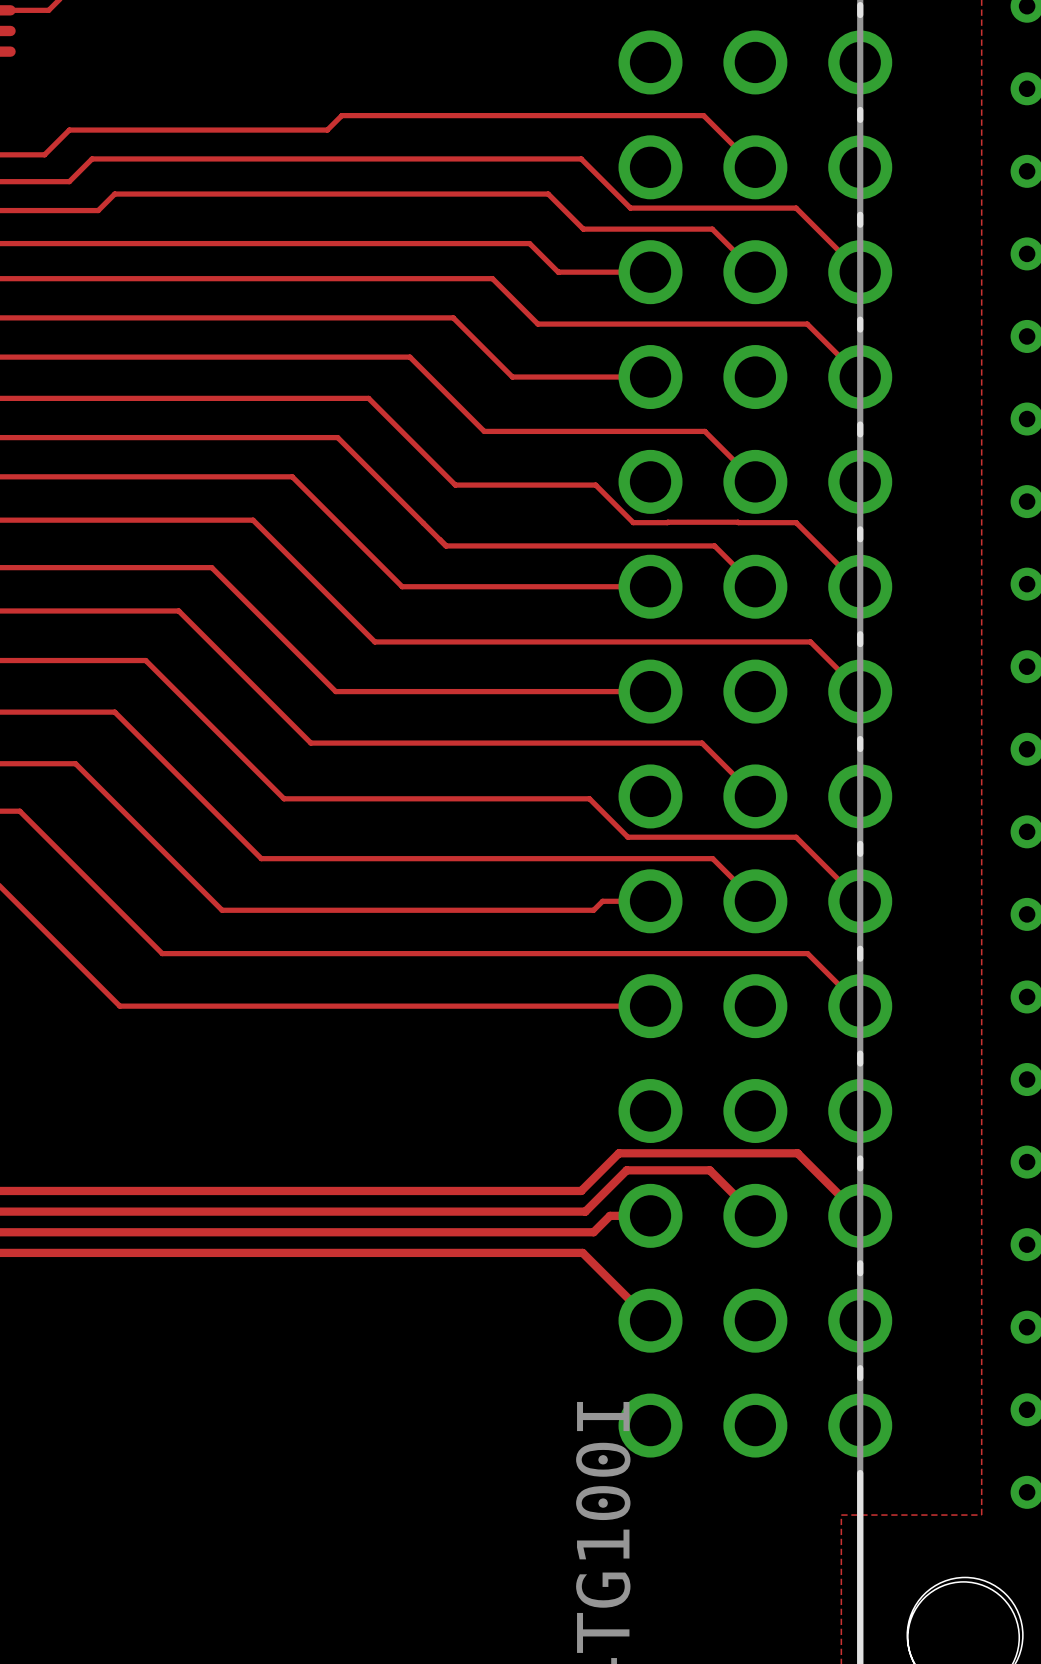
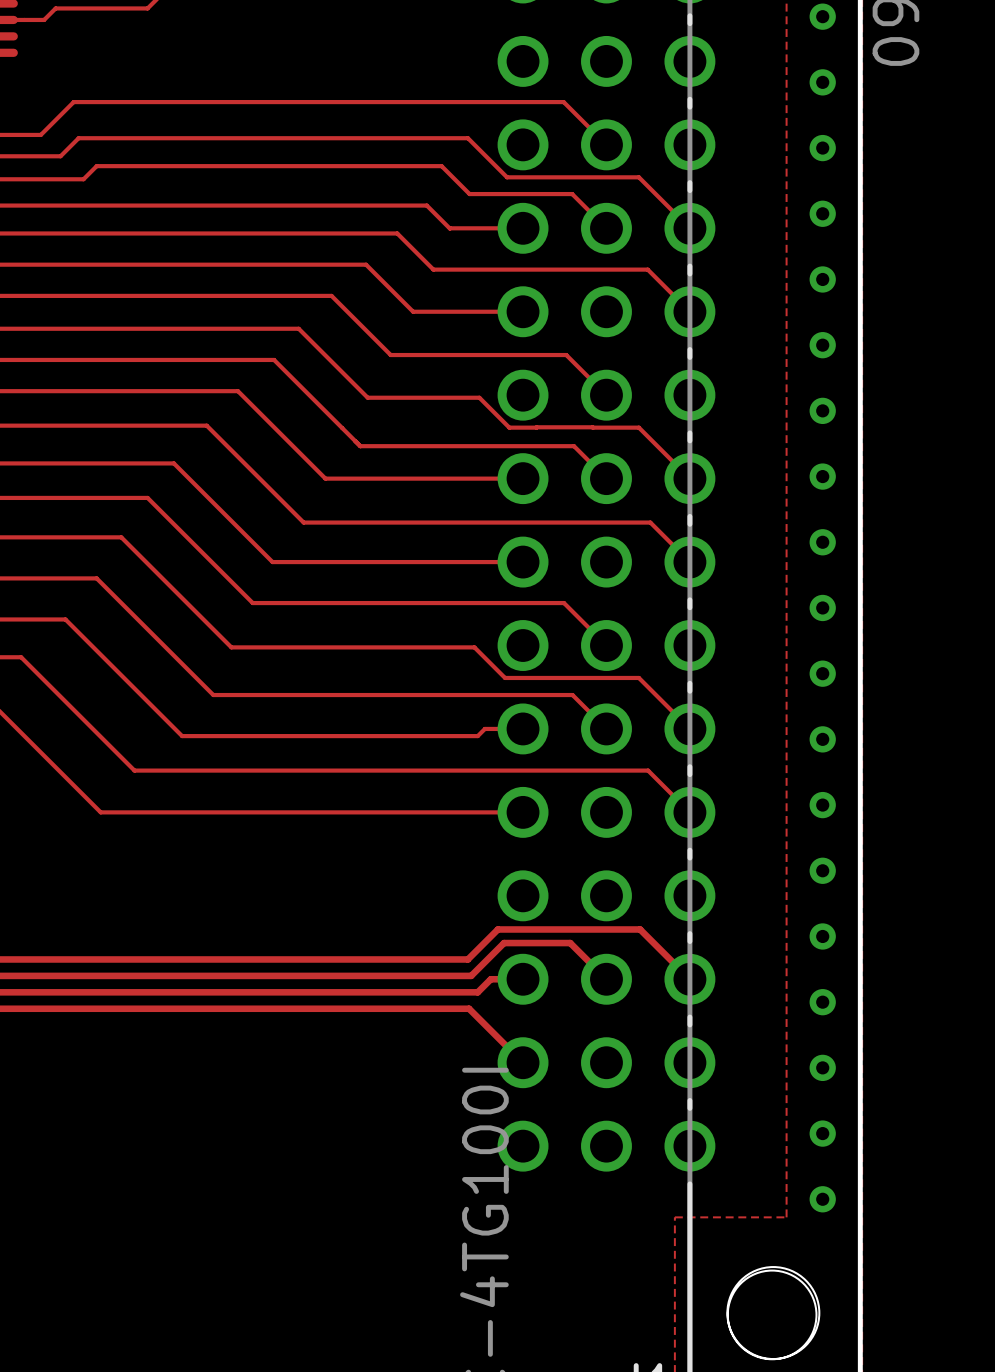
track: (703, 115) (341, 115) (327, 130) (69, 130) -> (565, 103) (563, 102) (73, 102) (60, 115)

